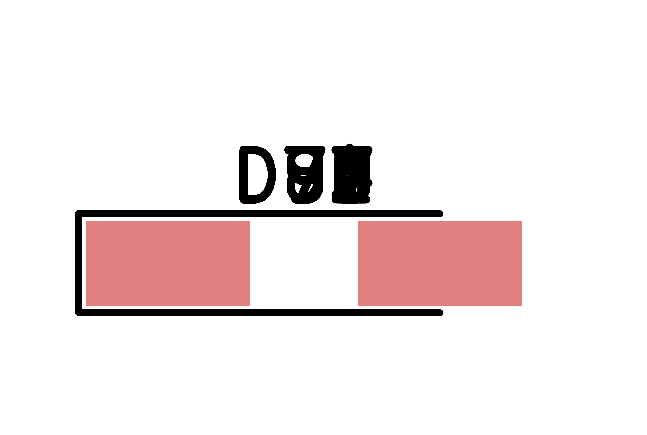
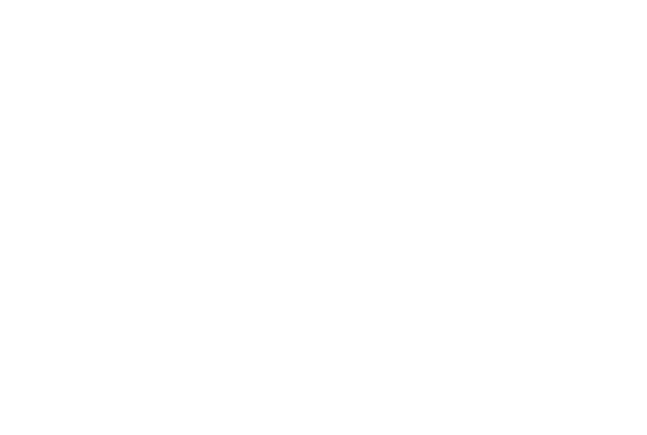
part: (298, 263) -> none
part: (298, 263) -> none
part: (298, 263) -> none
part: (298, 263) -> none
part: (298, 263) -> none
part: (298, 263) -> none
part: (298, 263) -> none
part: (298, 263) -> none
part: (298, 263) -> none
part: (298, 263) -> none
part: (298, 263) -> none
part: (298, 263) -> none
part: (298, 263) -> none
part: (298, 263) -> none
part: (298, 263) -> none
part: (298, 263) -> none
part: (298, 263) -> none
part: (298, 263) -> none
part: (298, 263) -> none
part: (298, 263) -> none
part: (298, 263) -> none
part: (298, 263) -> none
part: (298, 263) -> none
part: (298, 263) -> none
part: (298, 263) -> none
part: (298, 263) -> none

